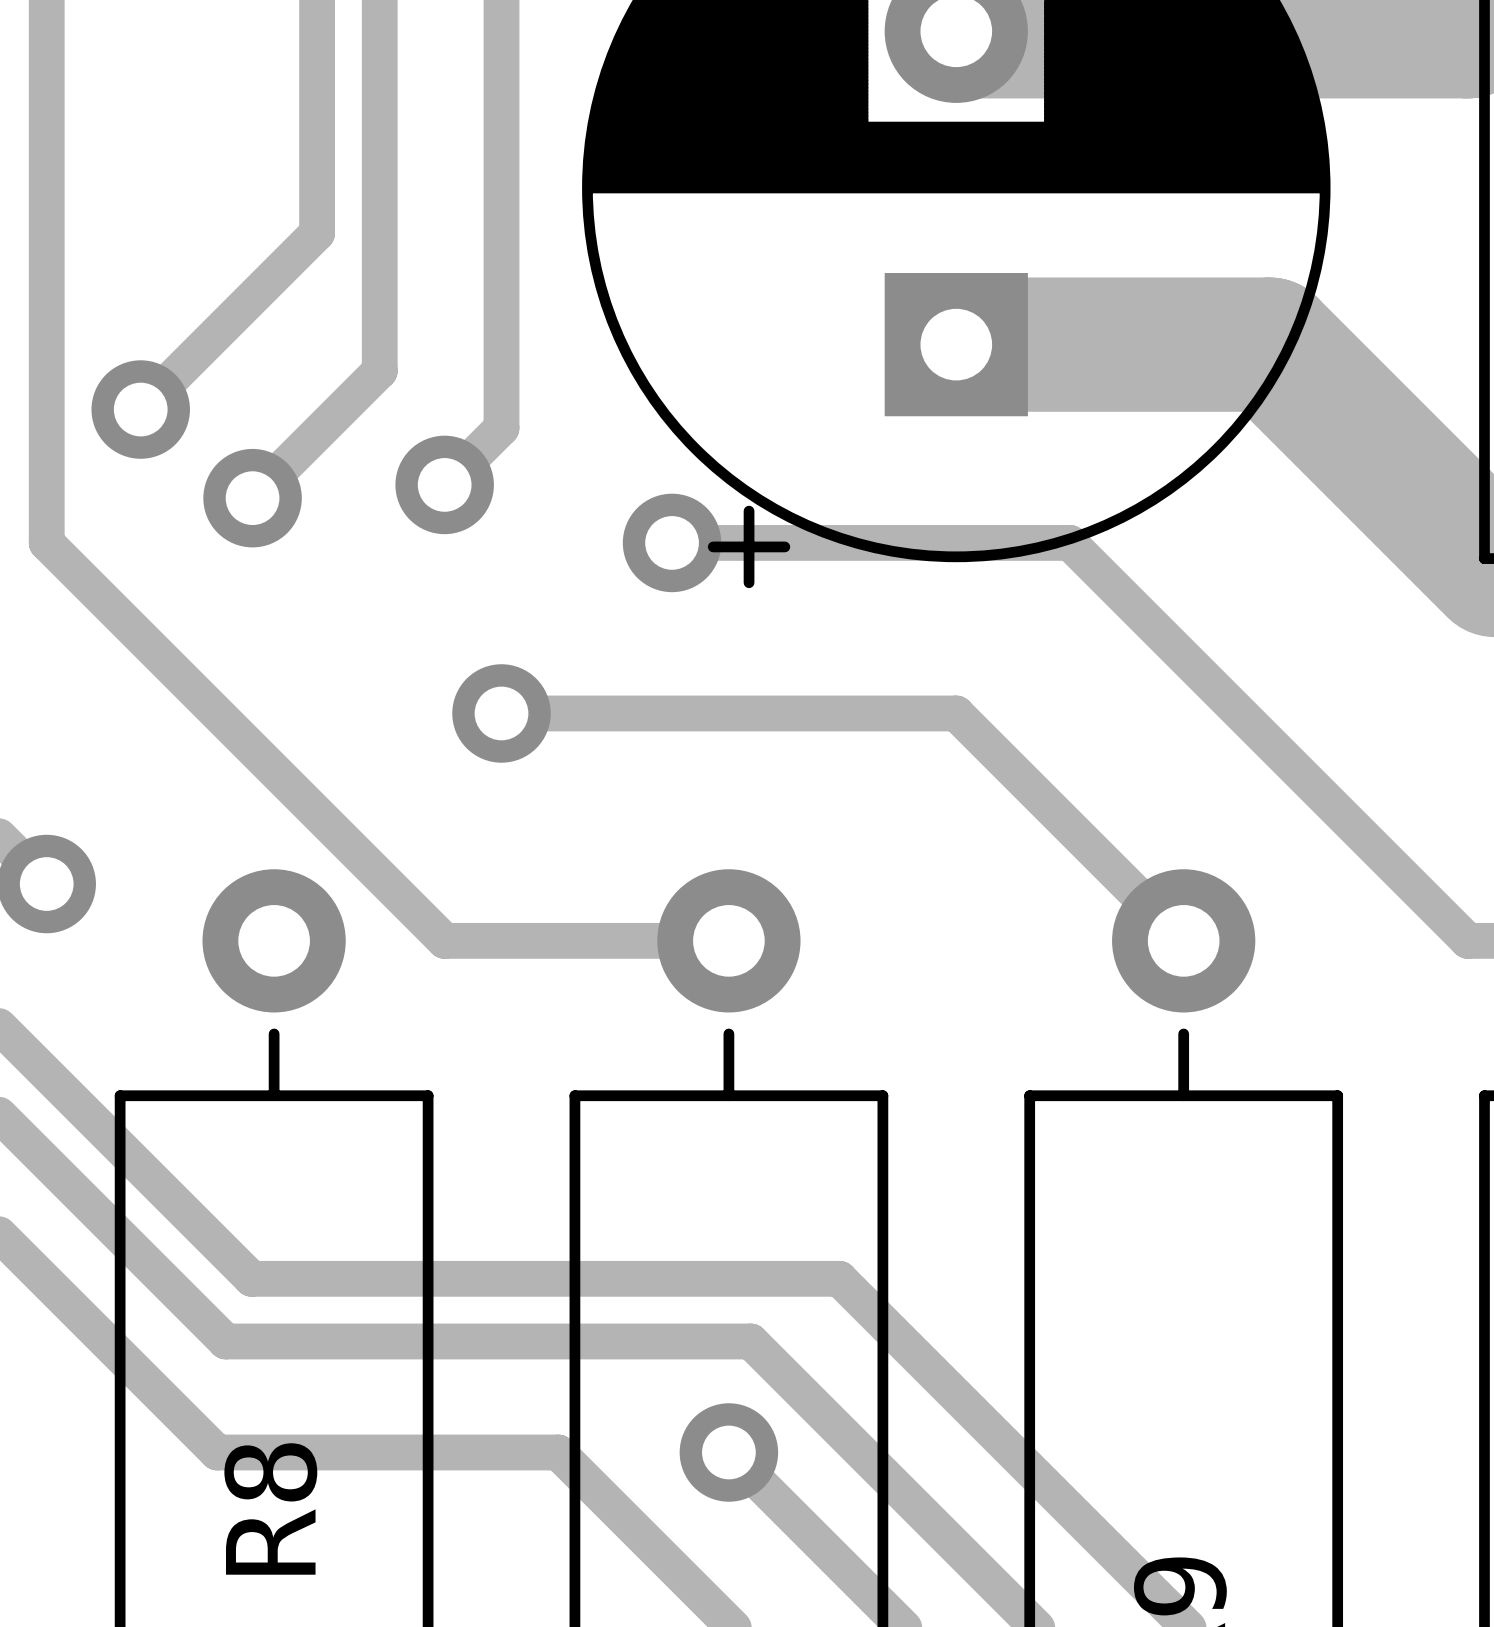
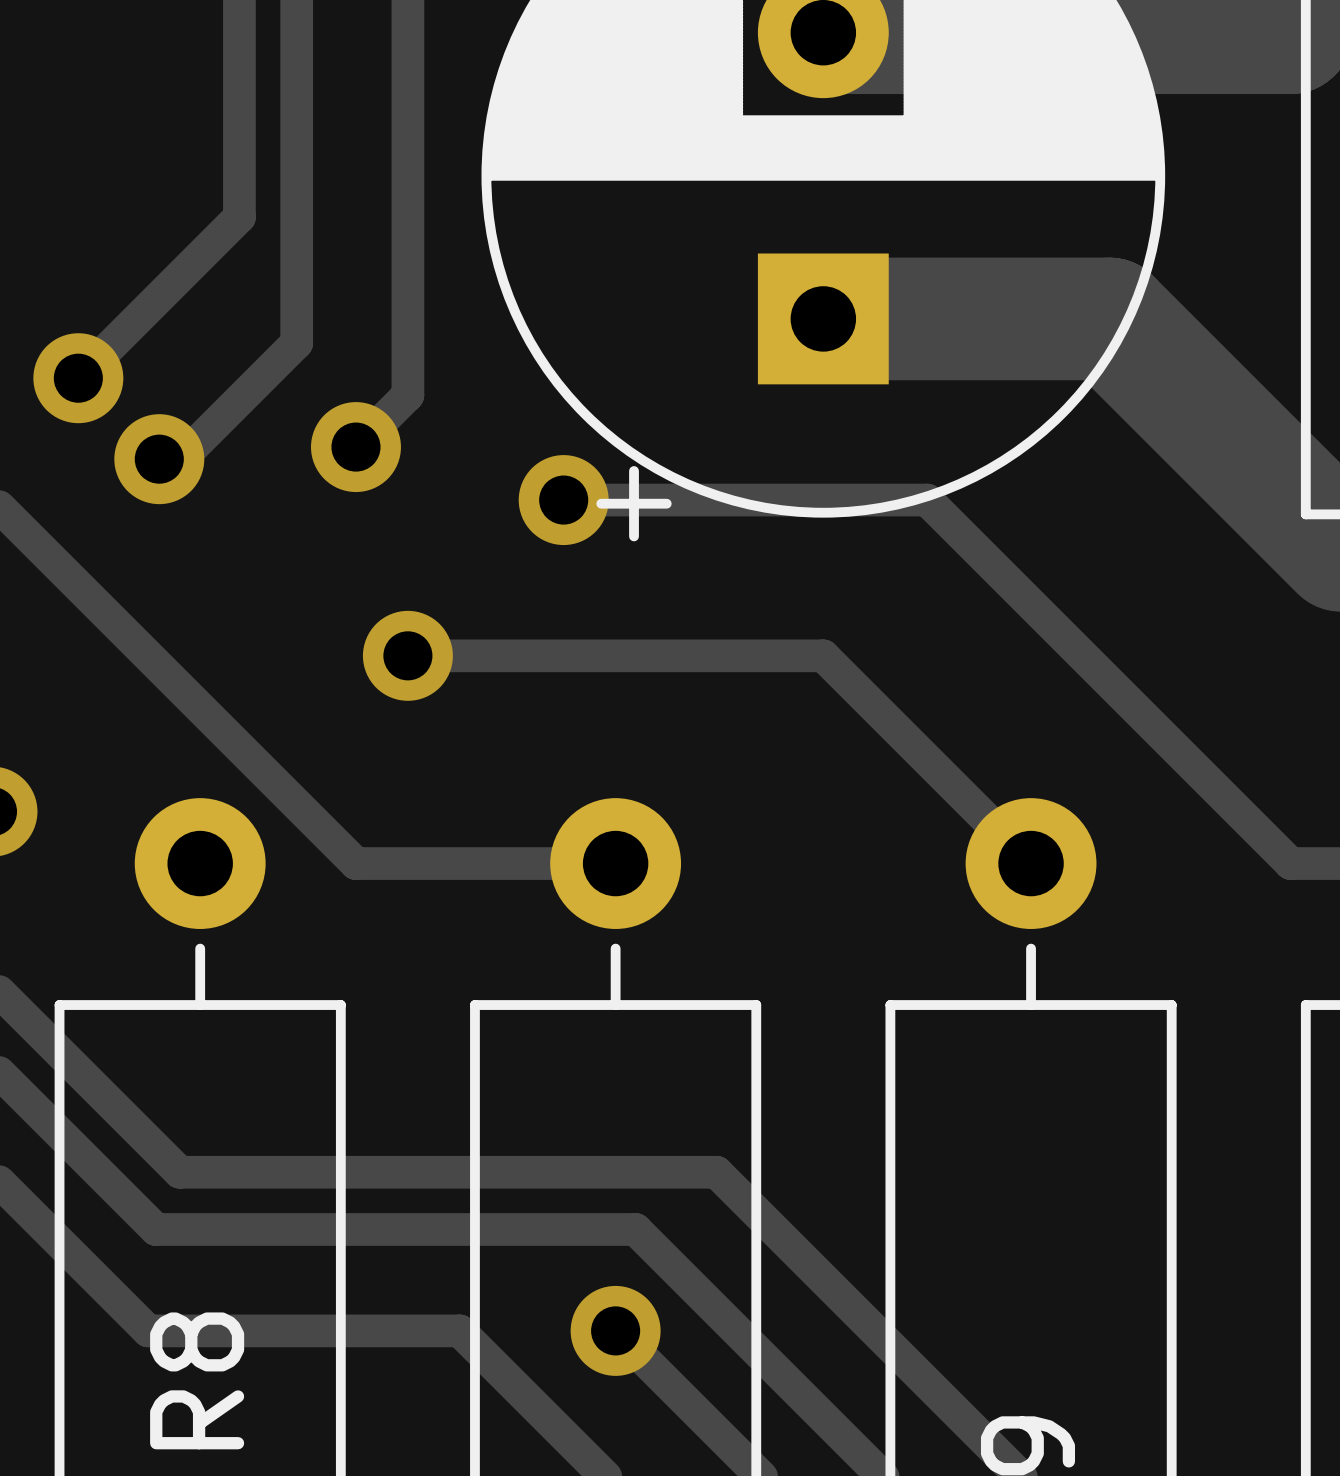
via position: (252, 498) -> (159, 459)

